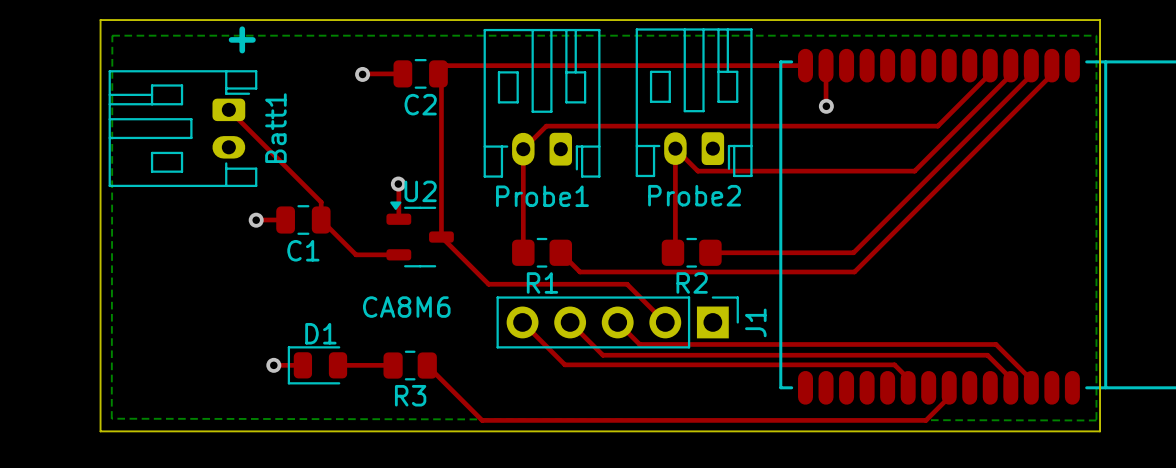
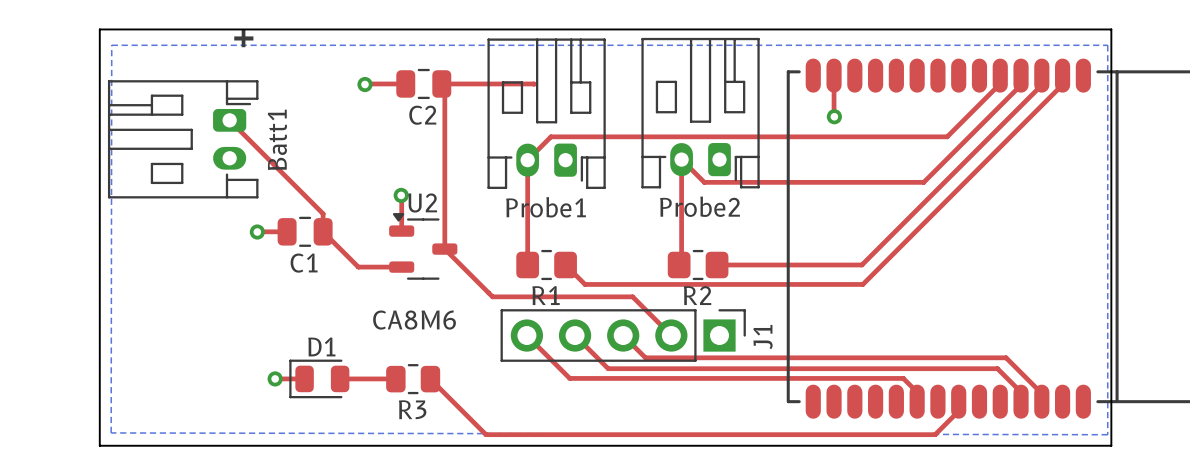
top track: (805, 65) (446, 65) (438, 73) -> (534, 84) (441, 83)

